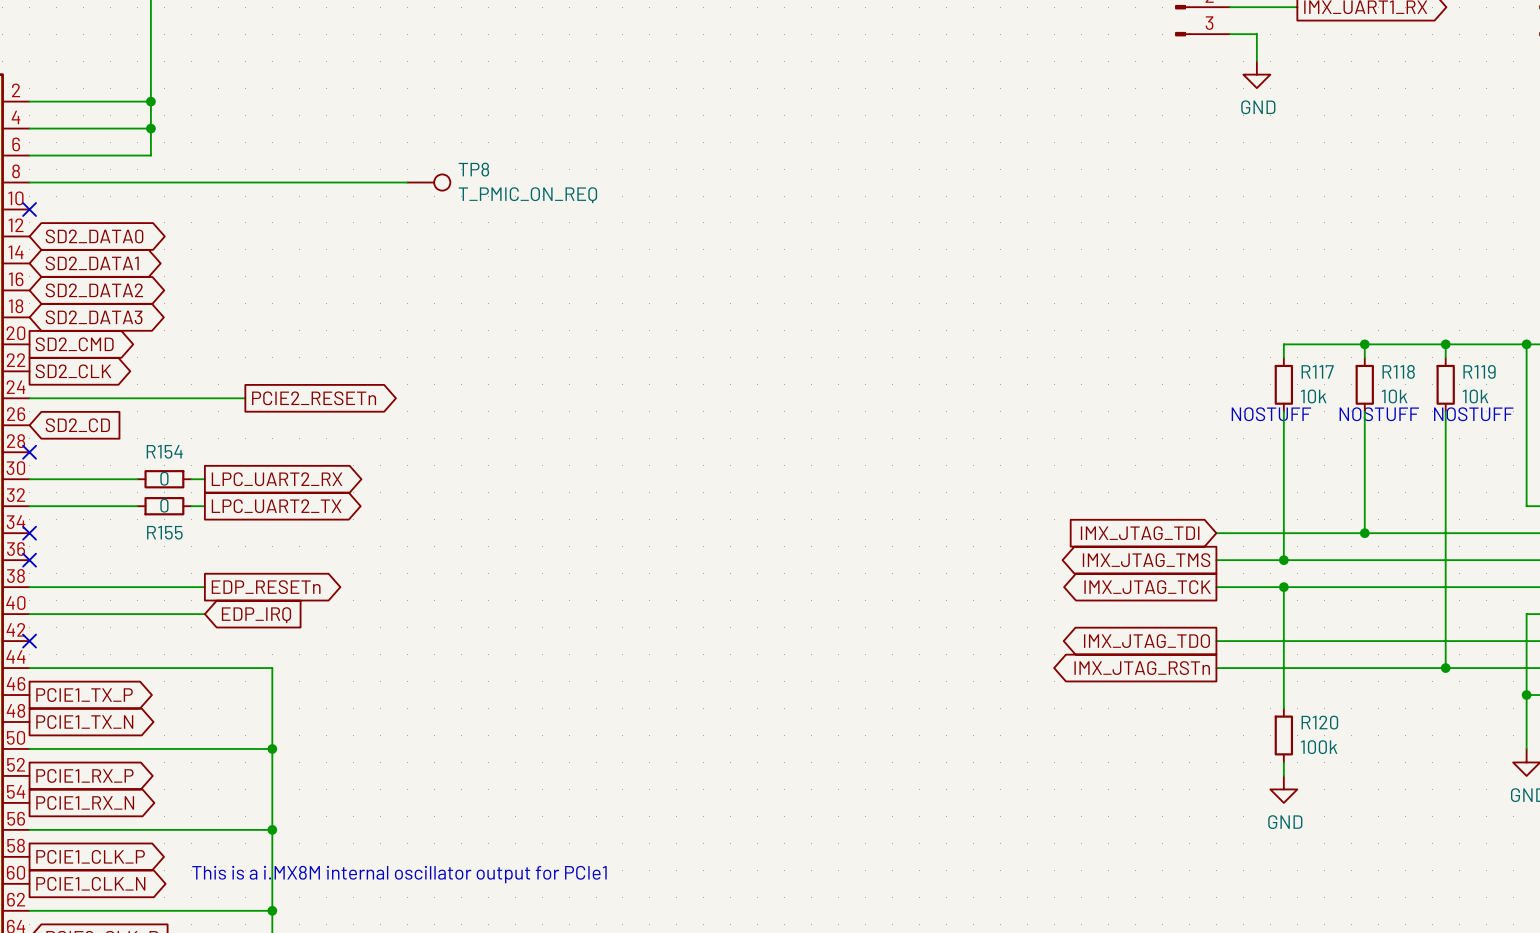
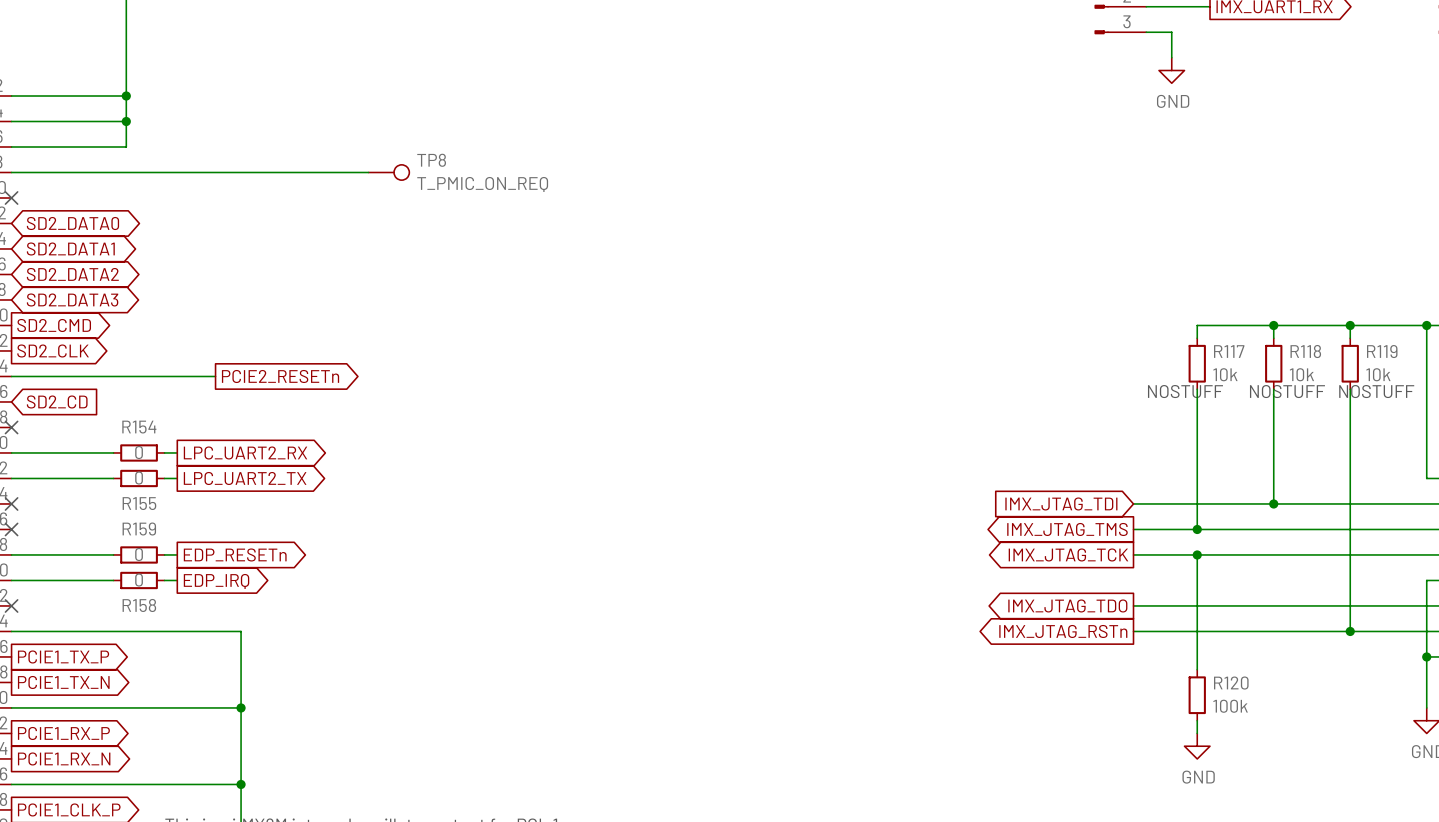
wire: (137, 587) (191, 587) -> none
R159: none -> 0 (139, 554)
wire: (137, 614) (191, 614) -> none
R158: none -> 0 (139, 580)
global label shape: input (256, 615) -> output (216, 581)

